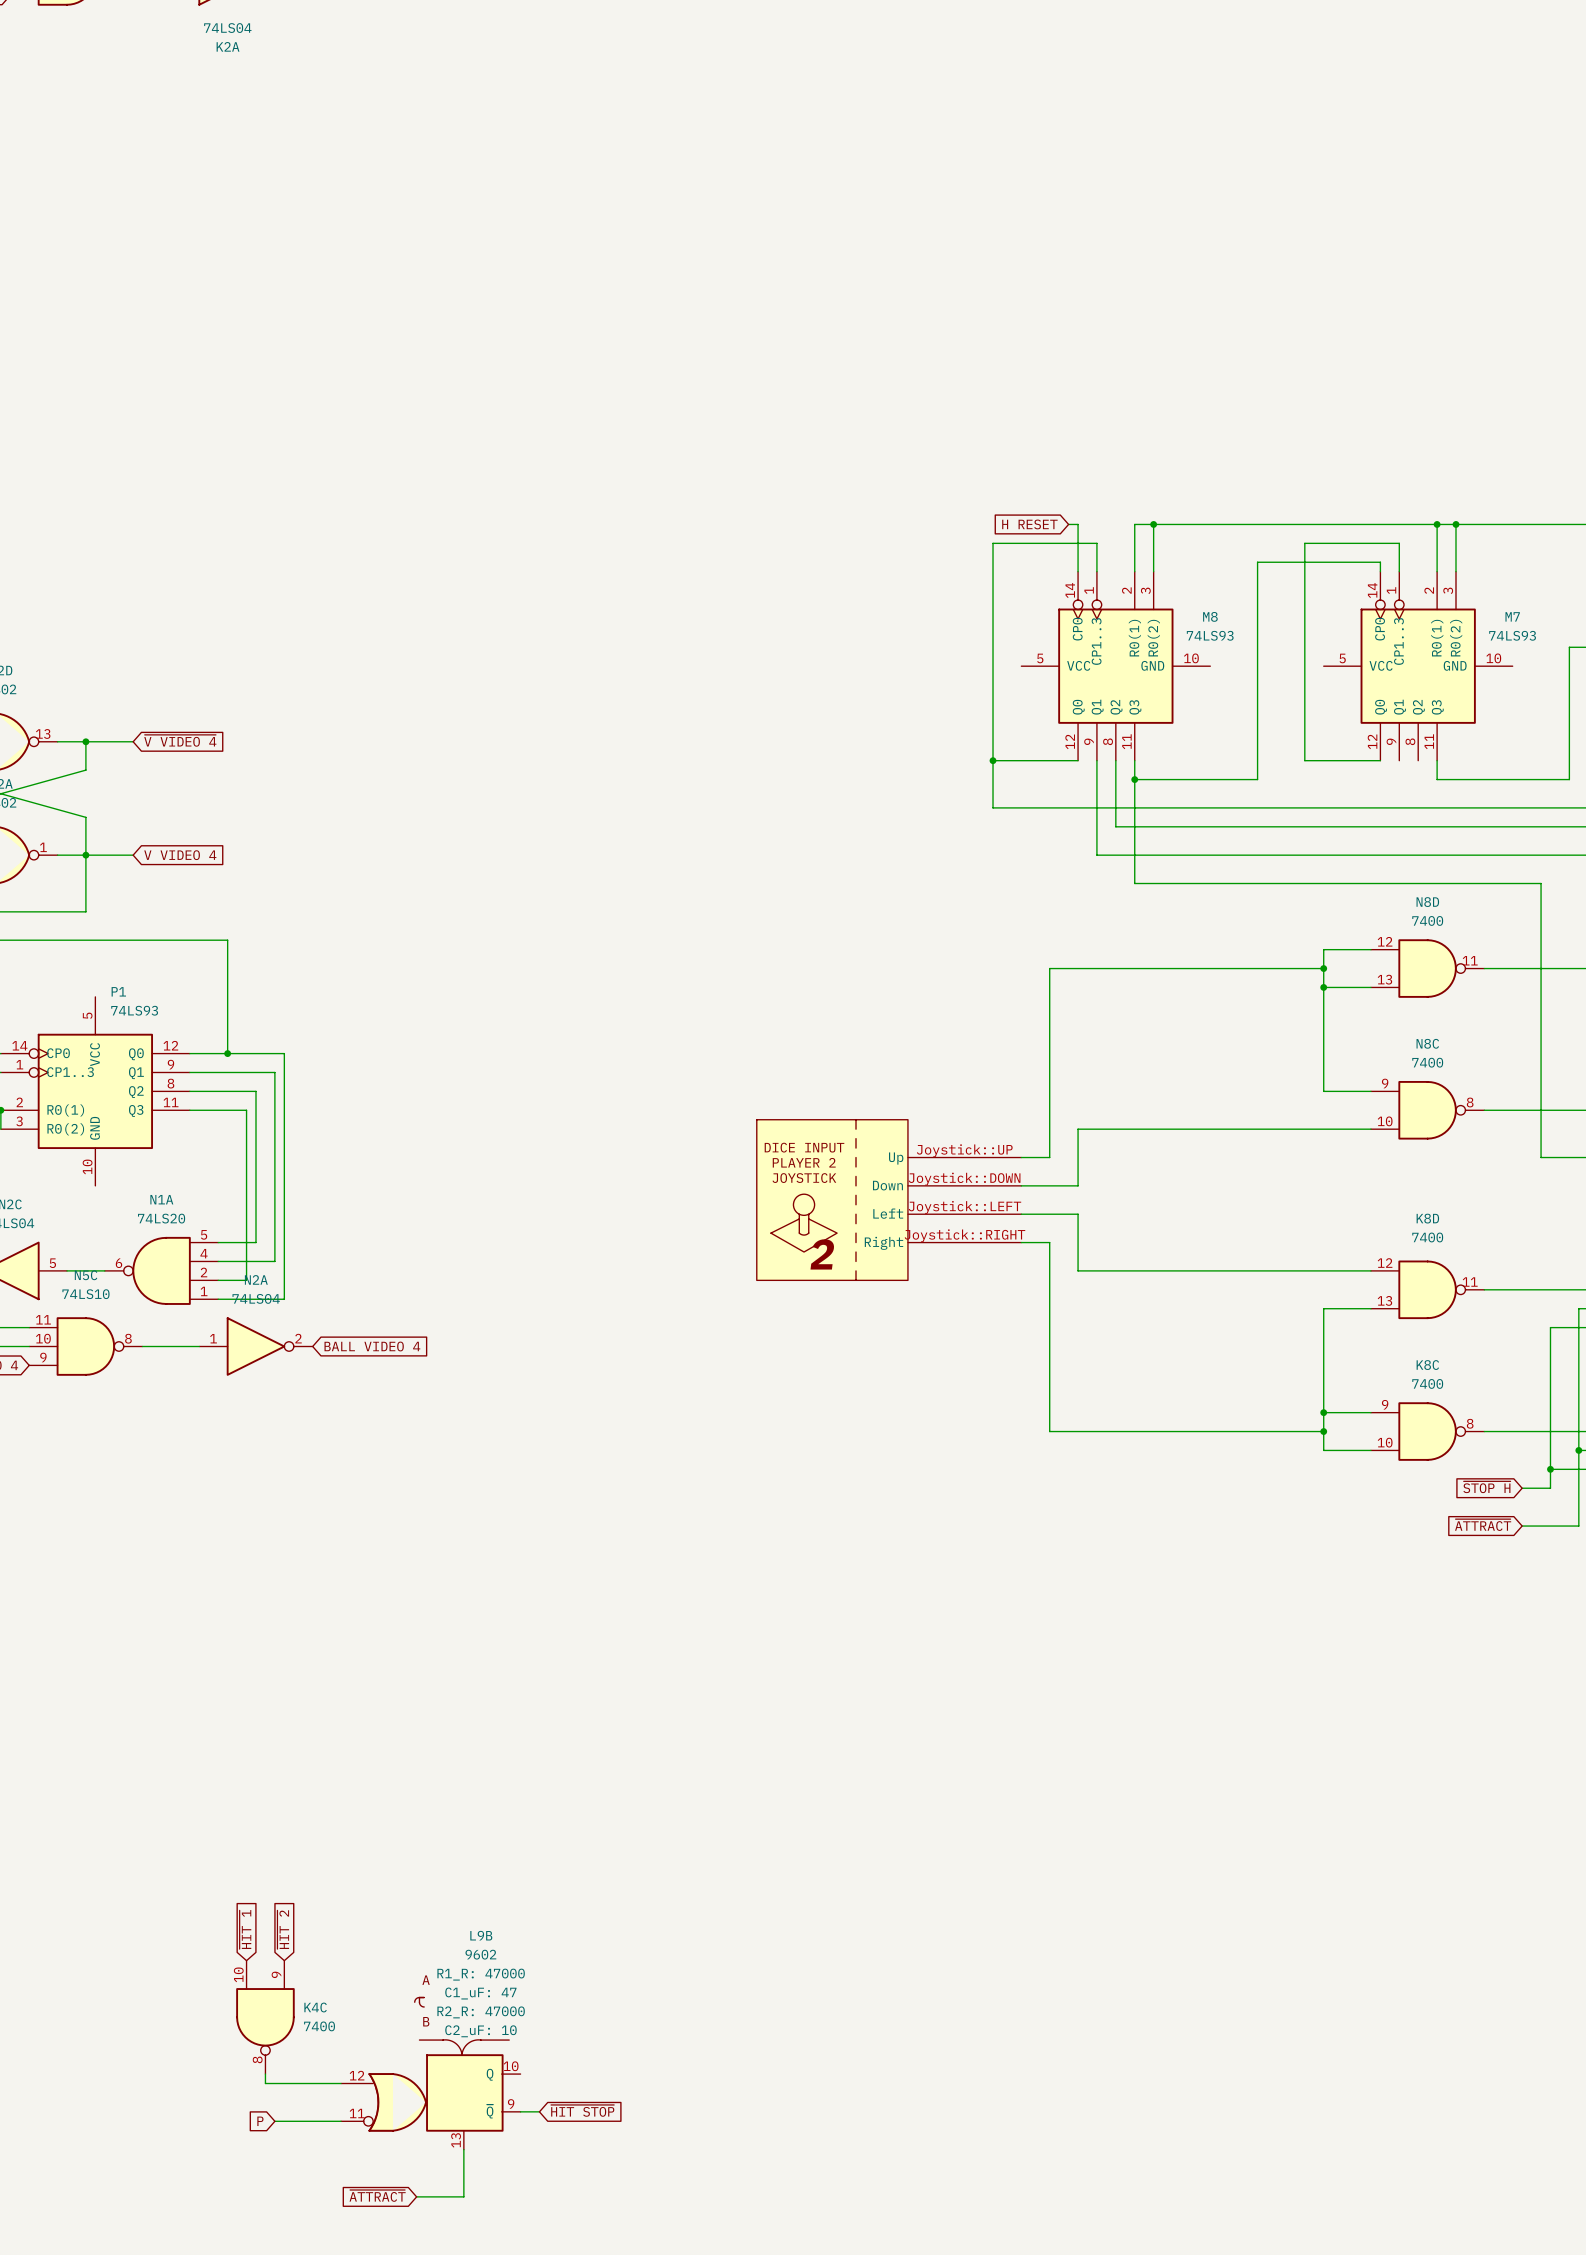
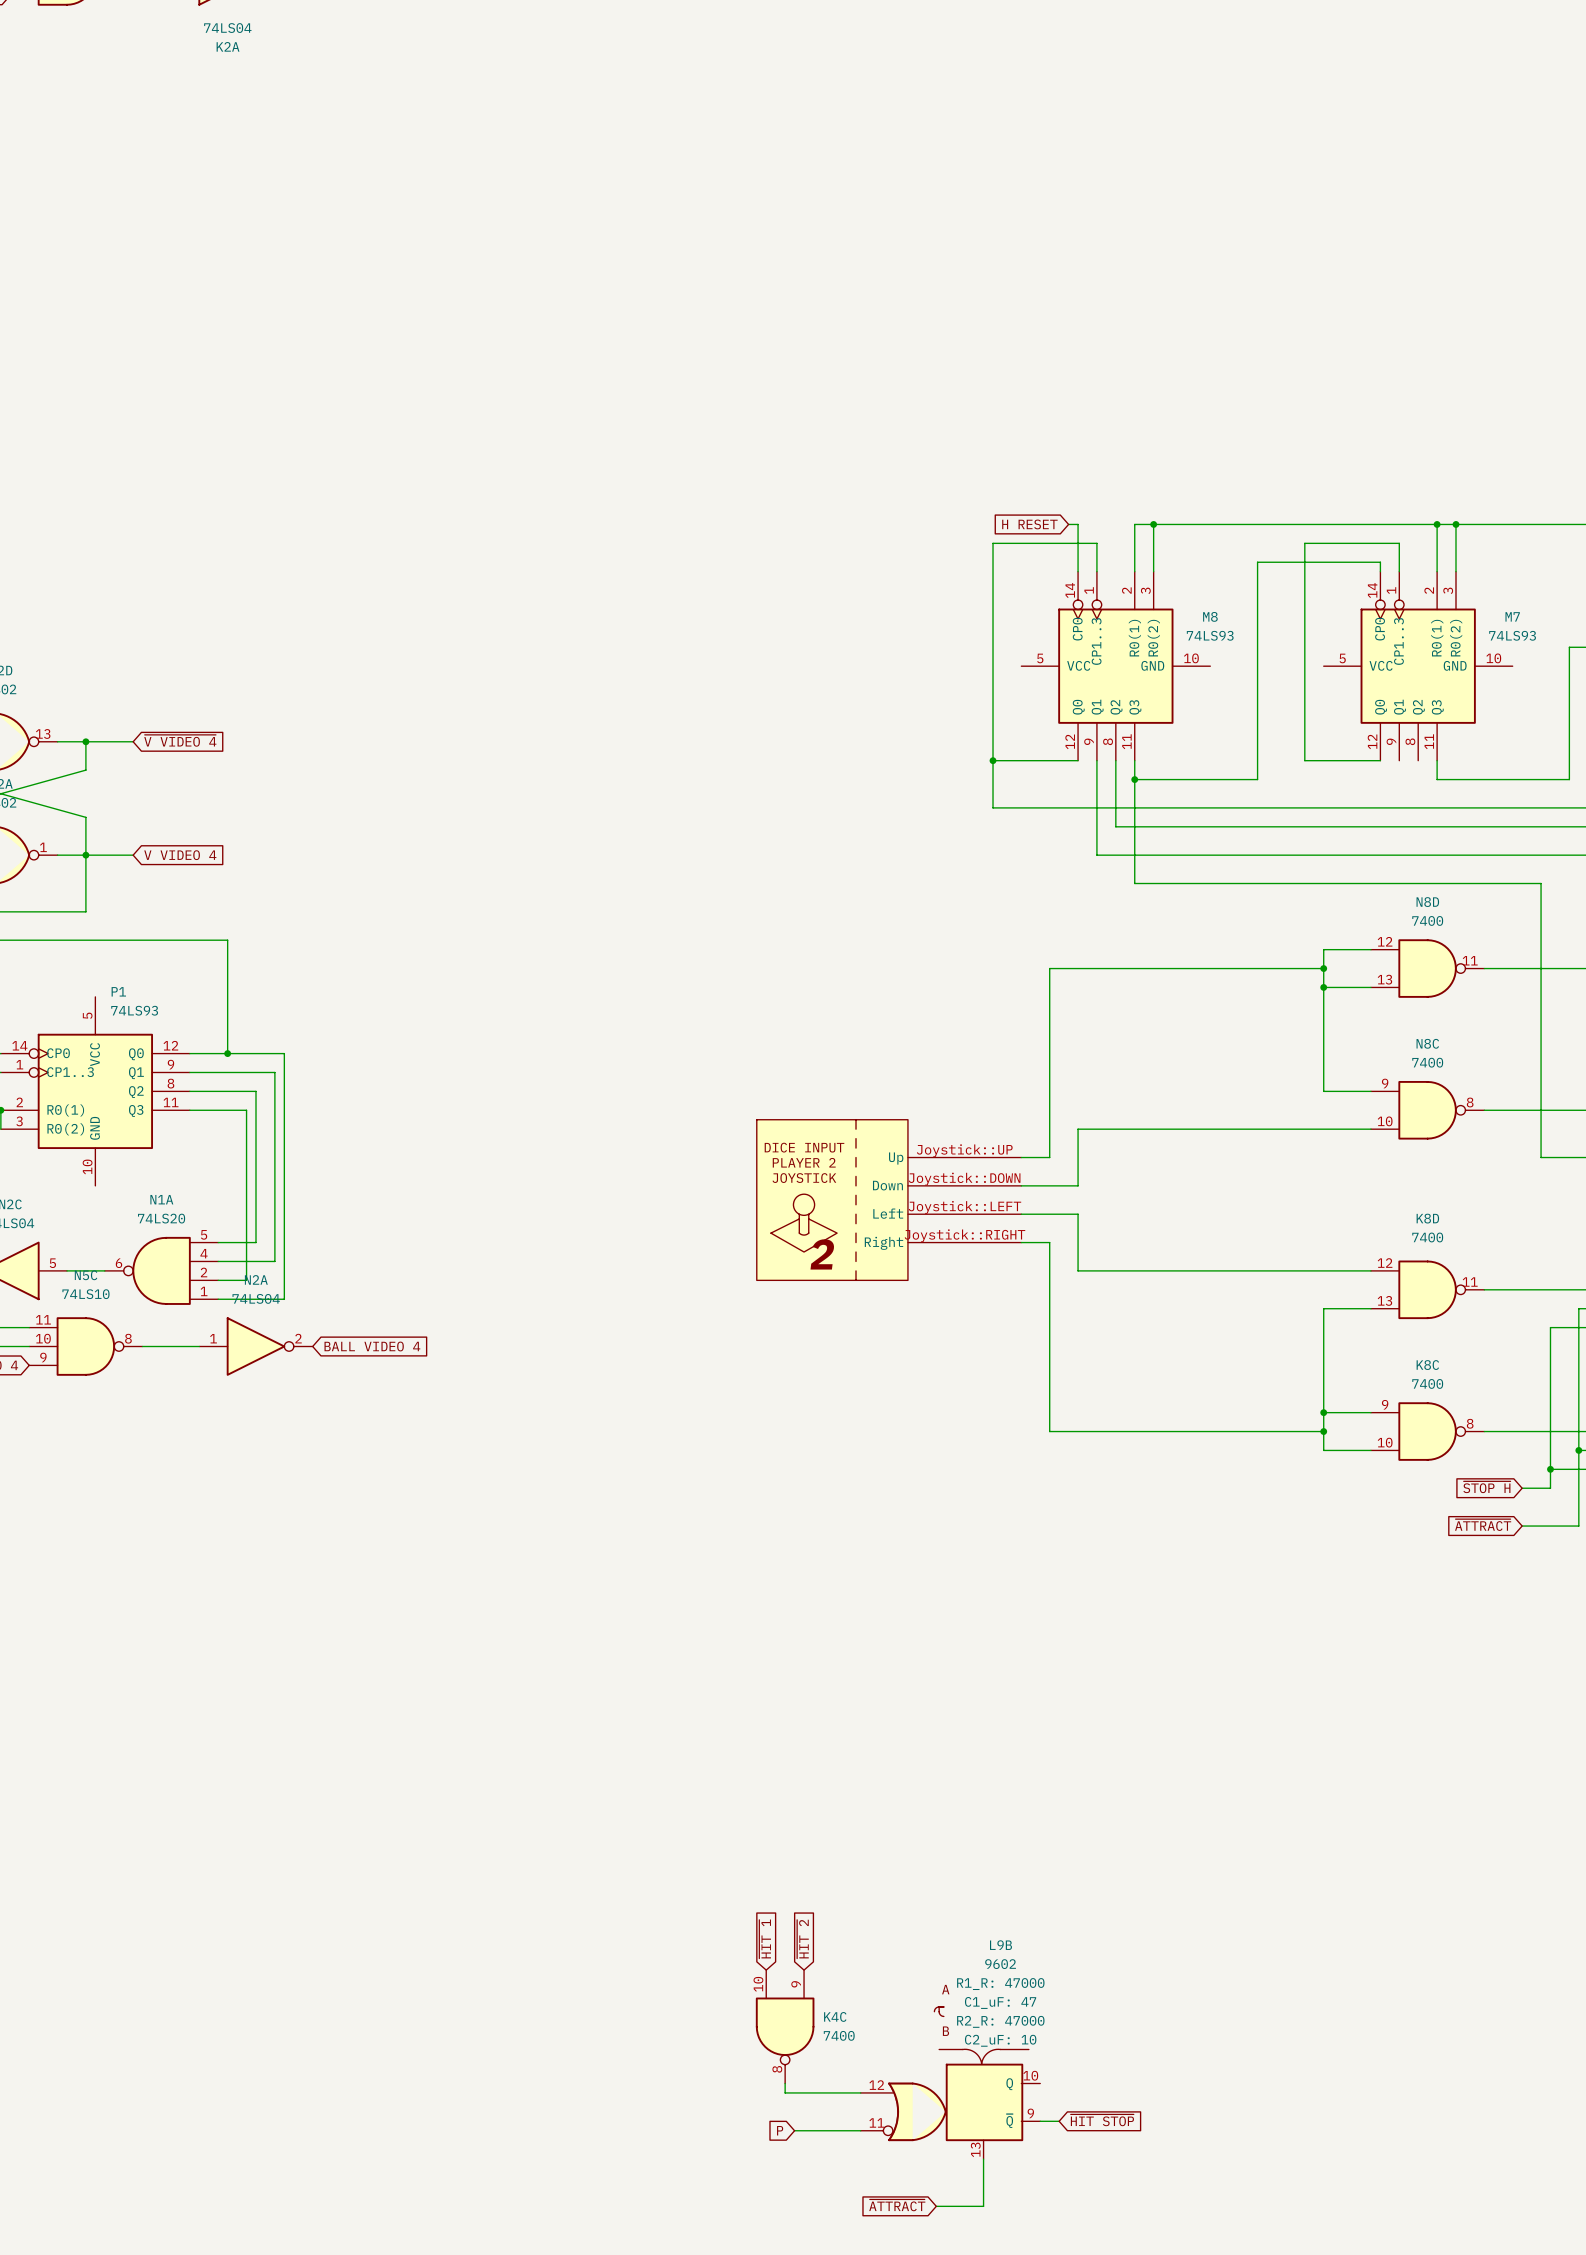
global label: ~{HIT 1} (245, 1929) -> none
global label: ~{HIT 2} (283, 1929) -> none
global label: none -> ~{HIT 1} (765, 1939)
global label: none -> ~{HIT 2} (802, 1939)
K4C position: (265, 2017) -> (785, 2026)
L9B position: (430, 2073) -> (950, 2083)
wire: (265, 2074) (265, 2083) (341, 2083) -> none
wire: none -> (785, 2083) (785, 2092) (860, 2092)
global label: ~{HIT STOP} (582, 2110) -> none
wire: (520, 2111) (539, 2111) -> none
global label: none -> ~{HIT STOP} (1102, 2120)
global label: P (260, 2121) -> none
wire: (274, 2121) (341, 2121) -> none
wire: none -> (1040, 2121) (1059, 2121)
global label: none -> P (780, 2130)
wire: none -> (794, 2130) (860, 2130)
wire: (463, 2149) (463, 2196) (416, 2196) -> none
wire: none -> (983, 2159) (983, 2206) (936, 2206)
global label: ~{ATTRACT} (377, 2195) -> none
global label: none -> ~{ATTRACT} (897, 2205)

